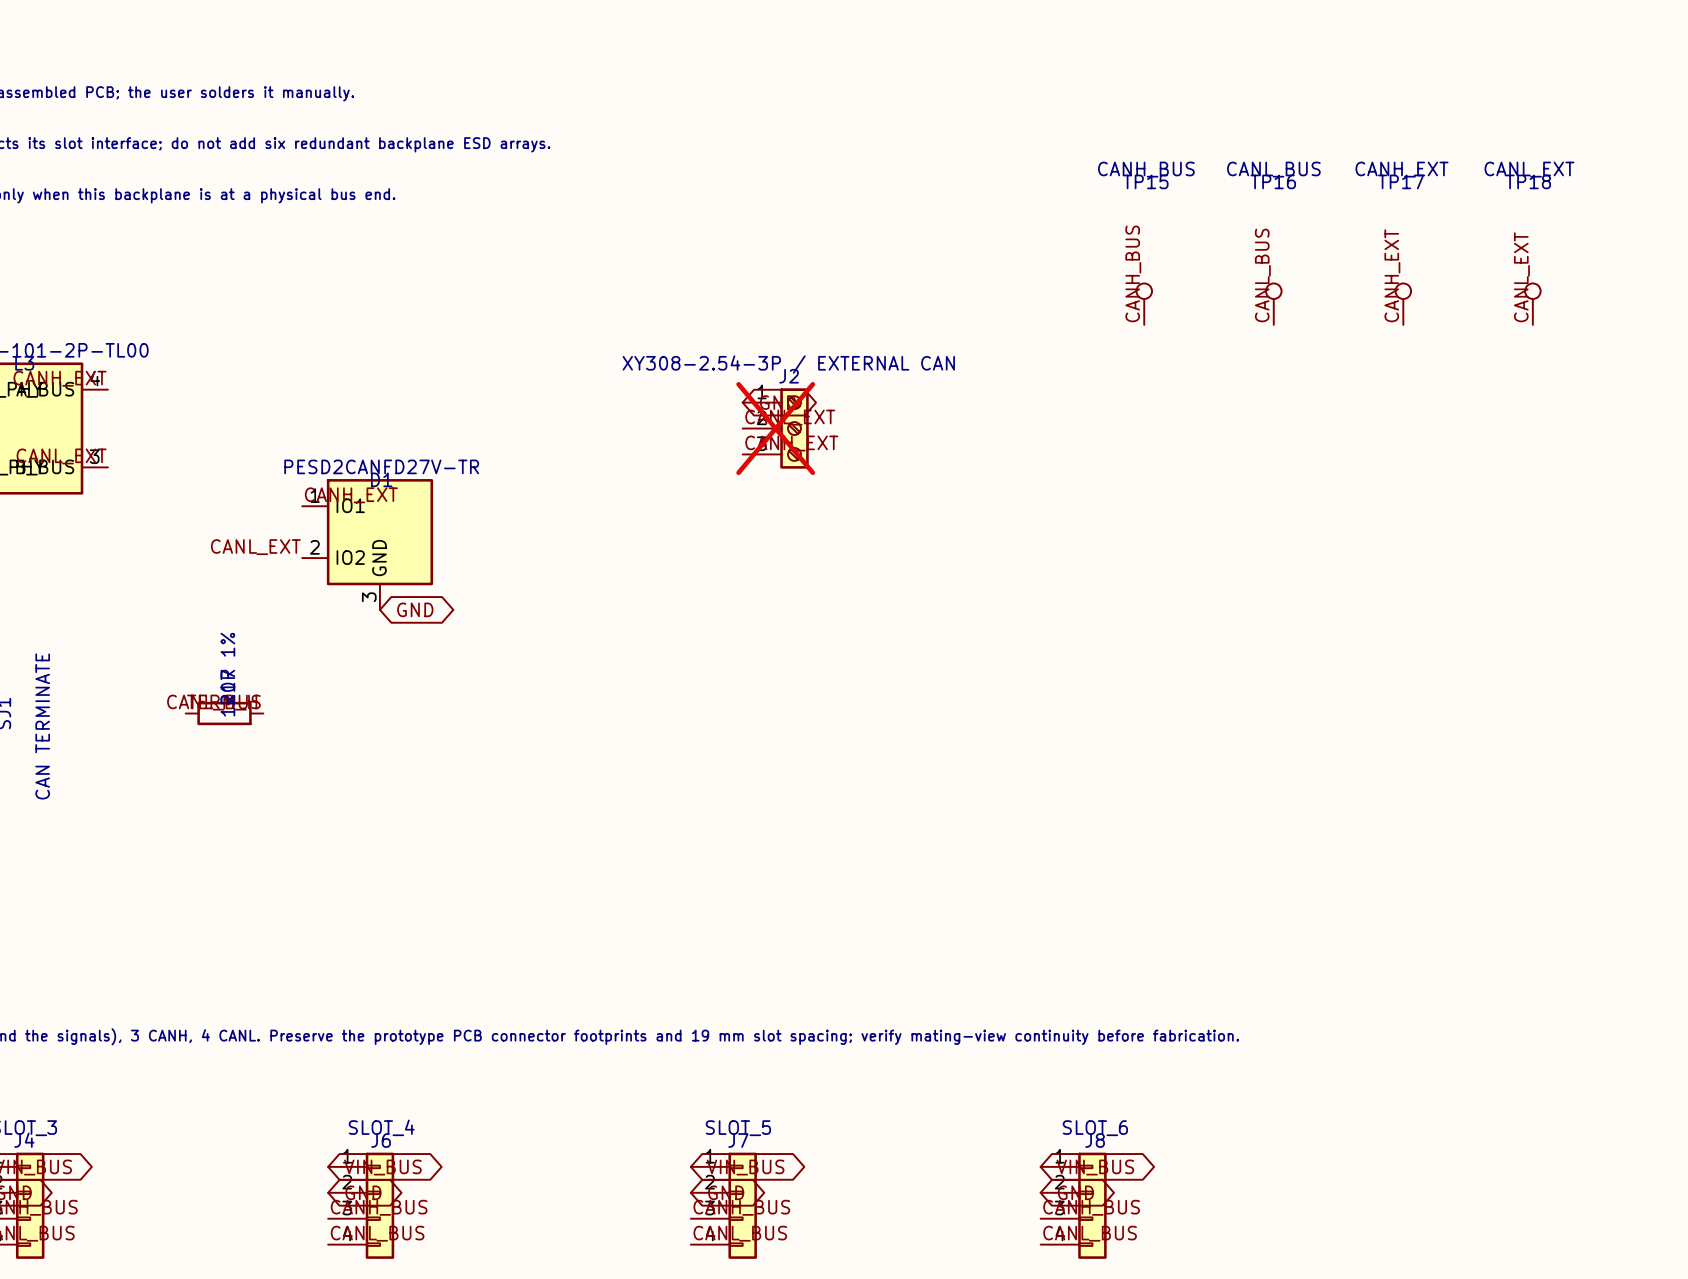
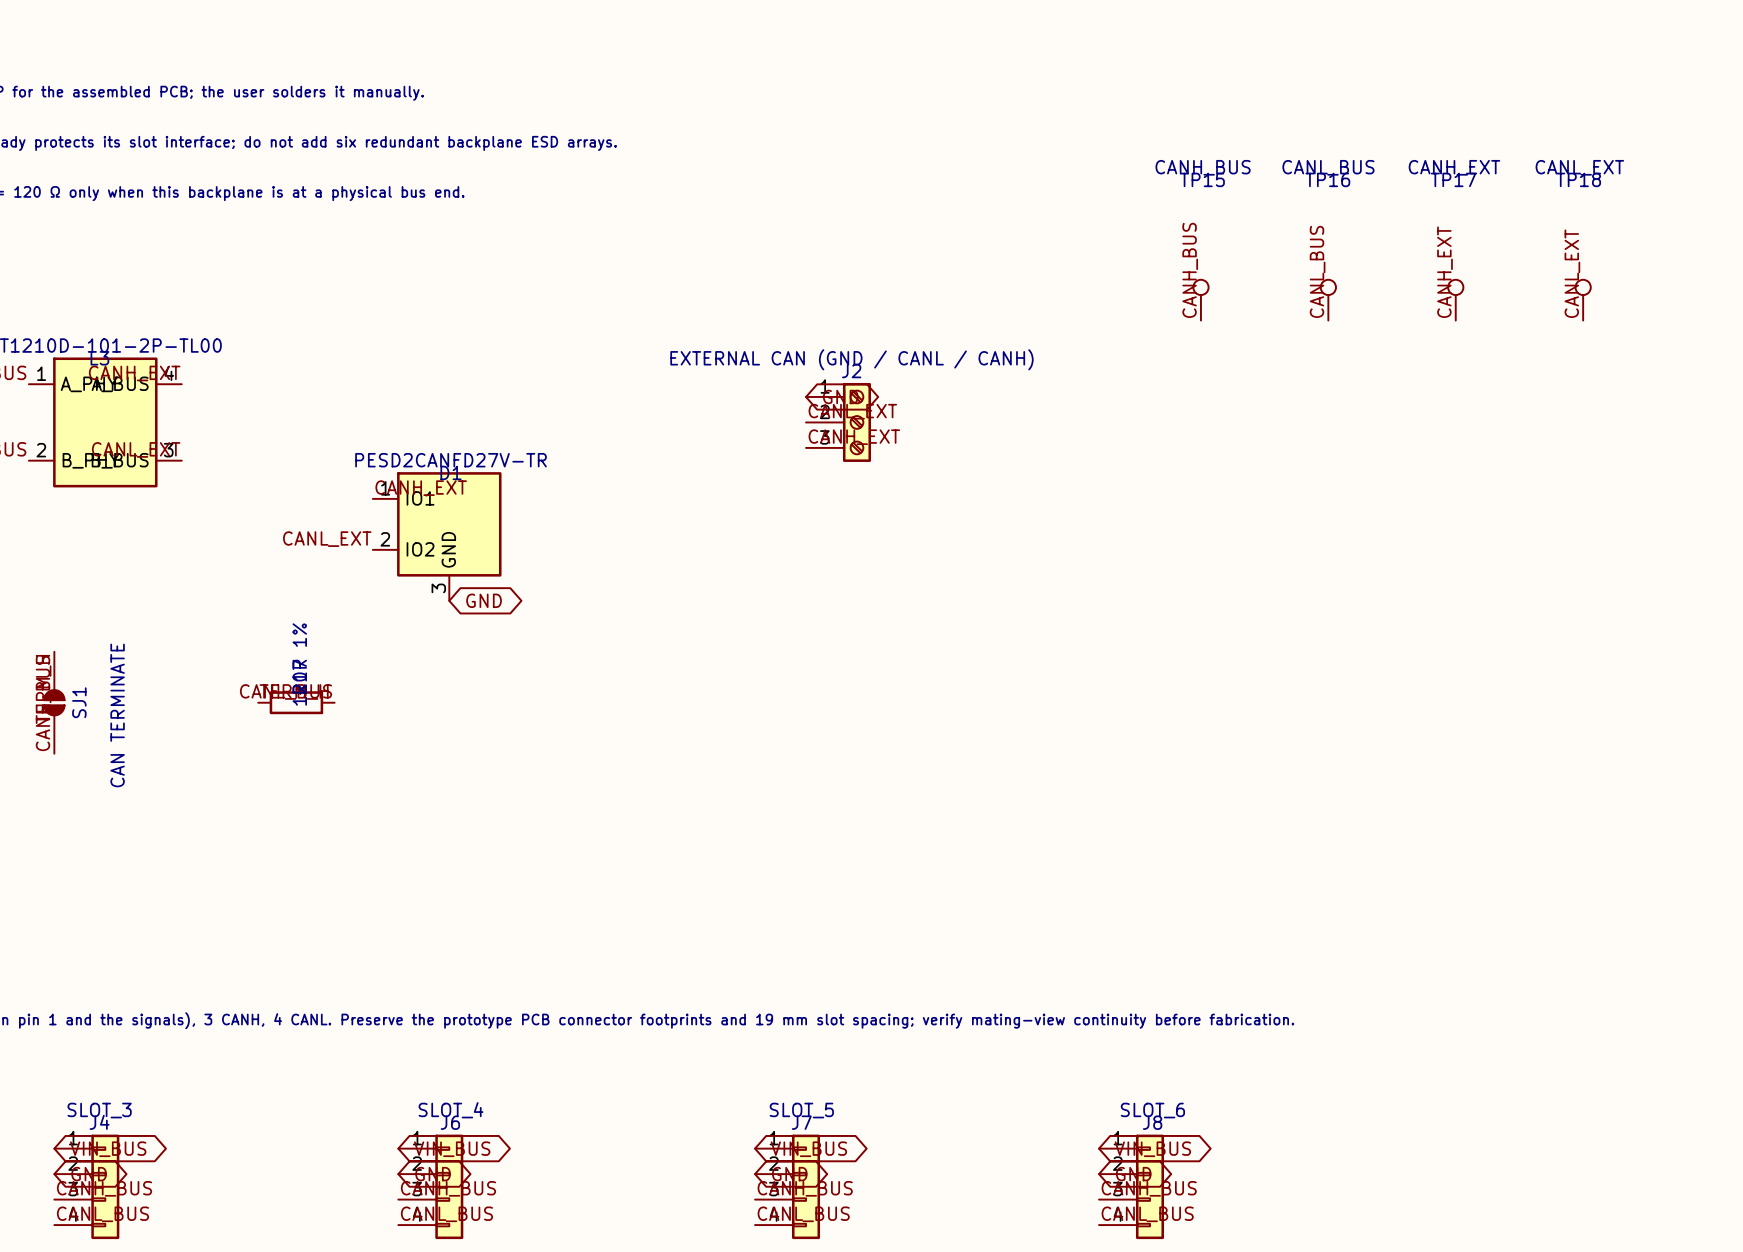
J2 value: XY308-2.54-3P / EXTERNAL CAN (788, 364) -> EXTERNAL CAN (GND / CANL / CANH) (851, 359)
J2 do-not-place cross: (775, 428) -> none

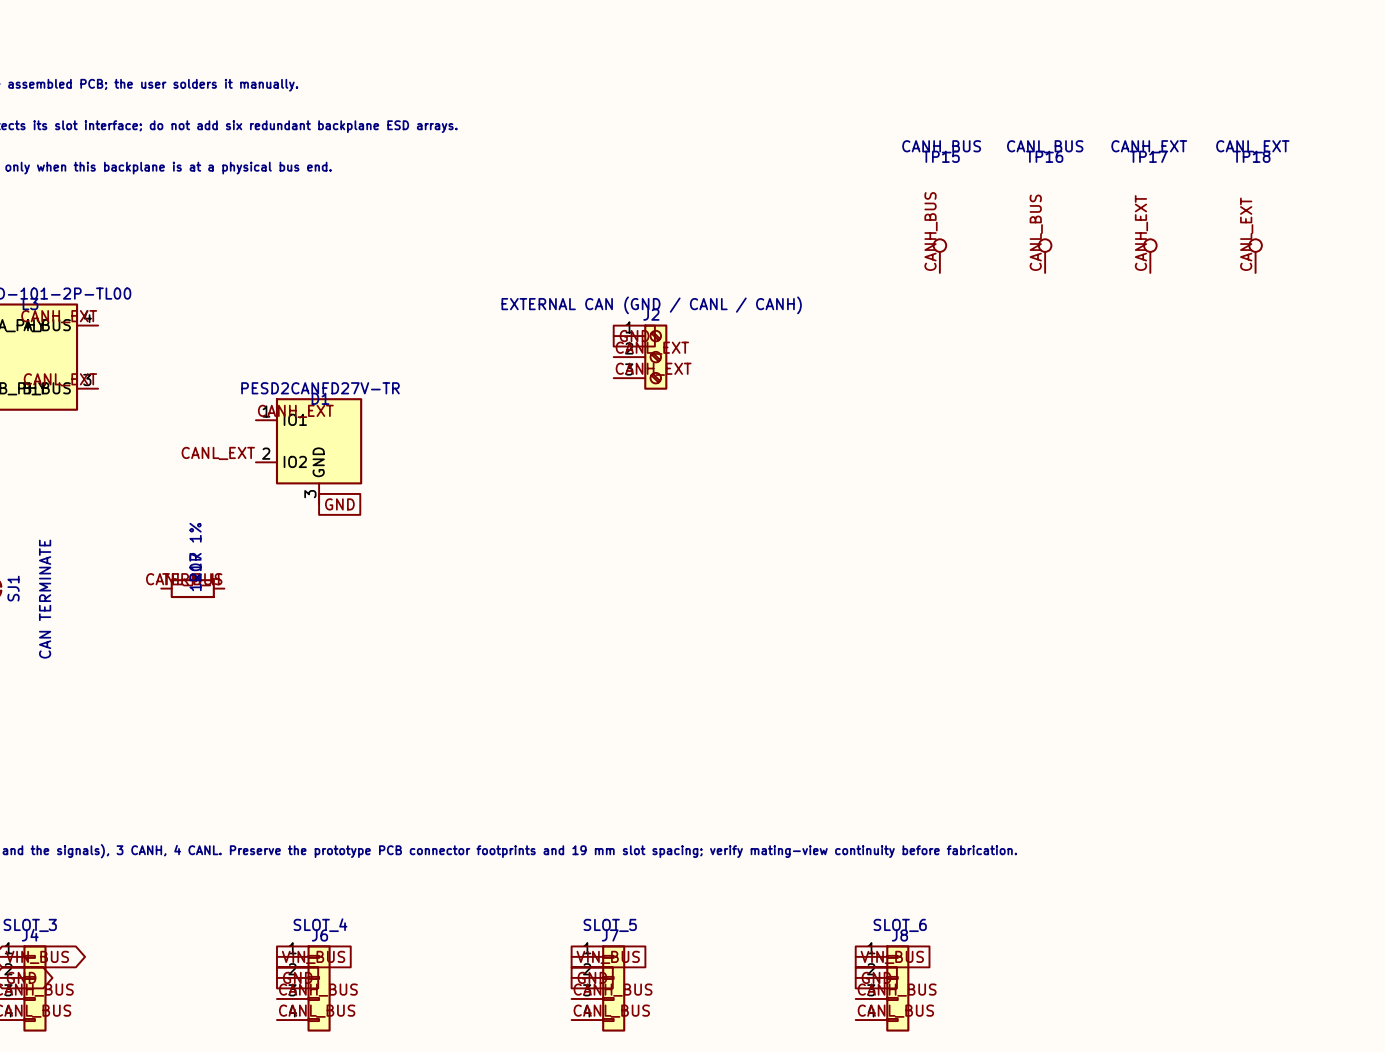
global label shape: bidirectional (840, 396) -> passive (634, 336)
global label shape: bidirectional (484, 600) -> passive (339, 504)
global label shape: bidirectional (452, 1149) -> passive (313, 957)
global label shape: bidirectional (808, 1149) -> passive (608, 957)
global label shape: bidirectional (1152, 1149) -> passive (892, 957)
global label shape: bidirectional (433, 1174) -> passive (297, 977)
global label shape: bidirectional (789, 1174) -> passive (592, 977)
global label shape: bidirectional (1133, 1174) -> passive (876, 977)

